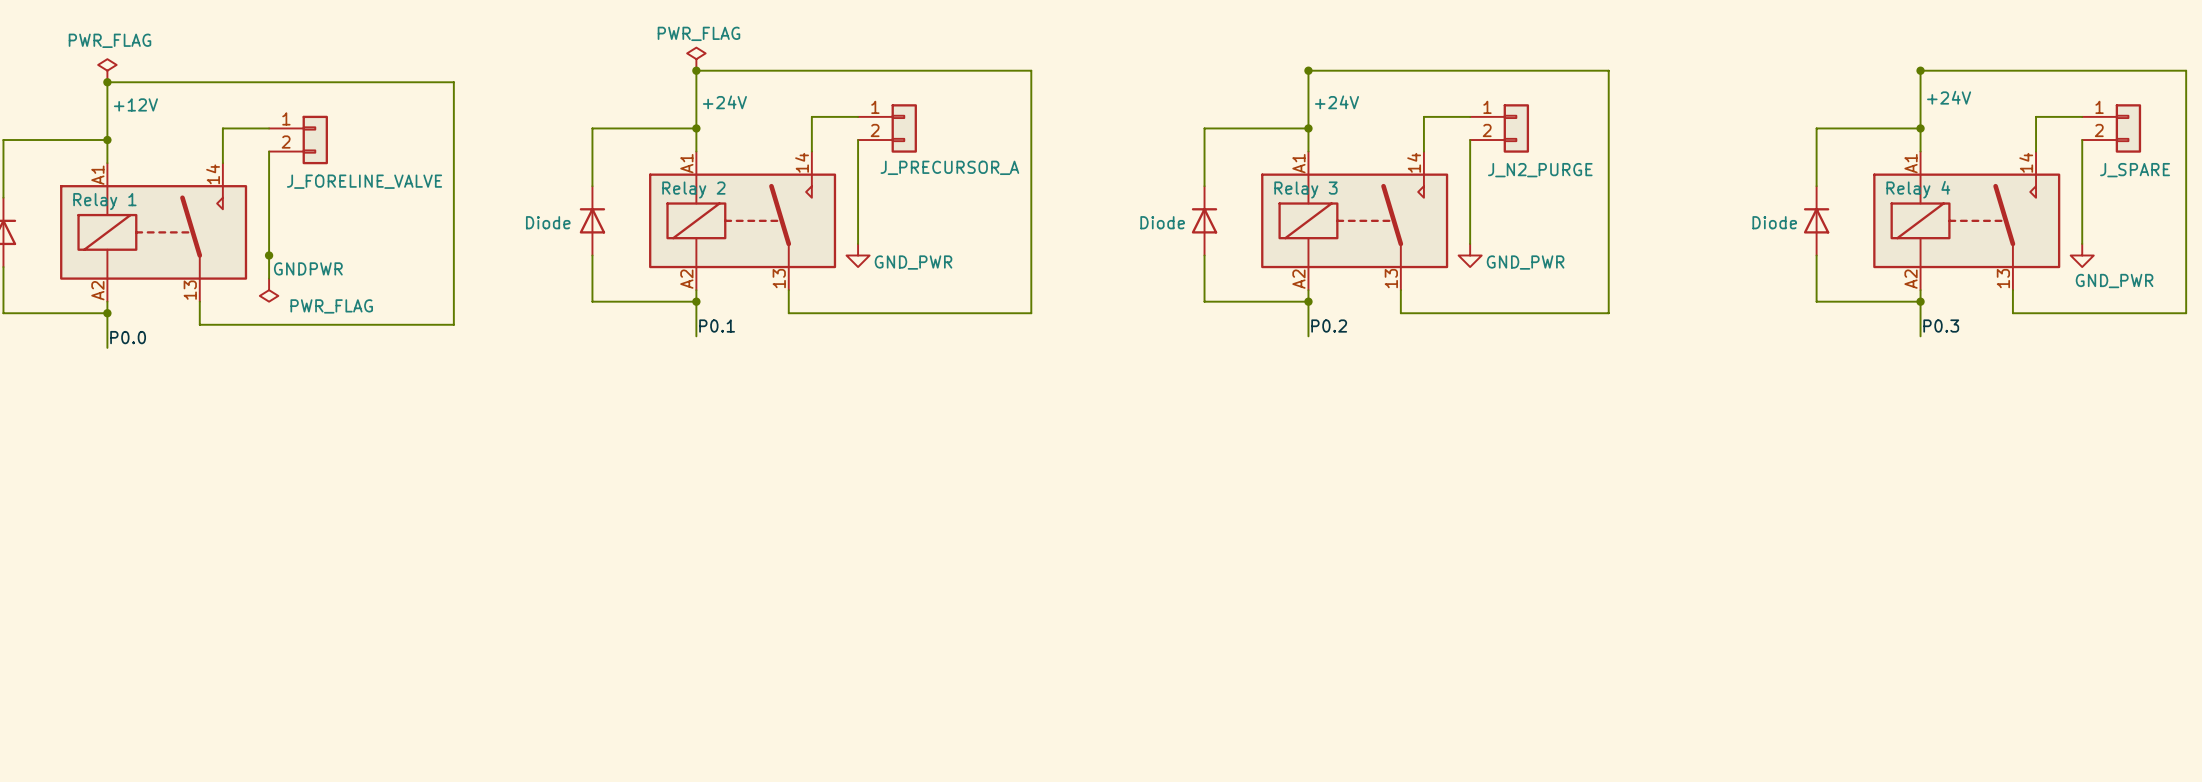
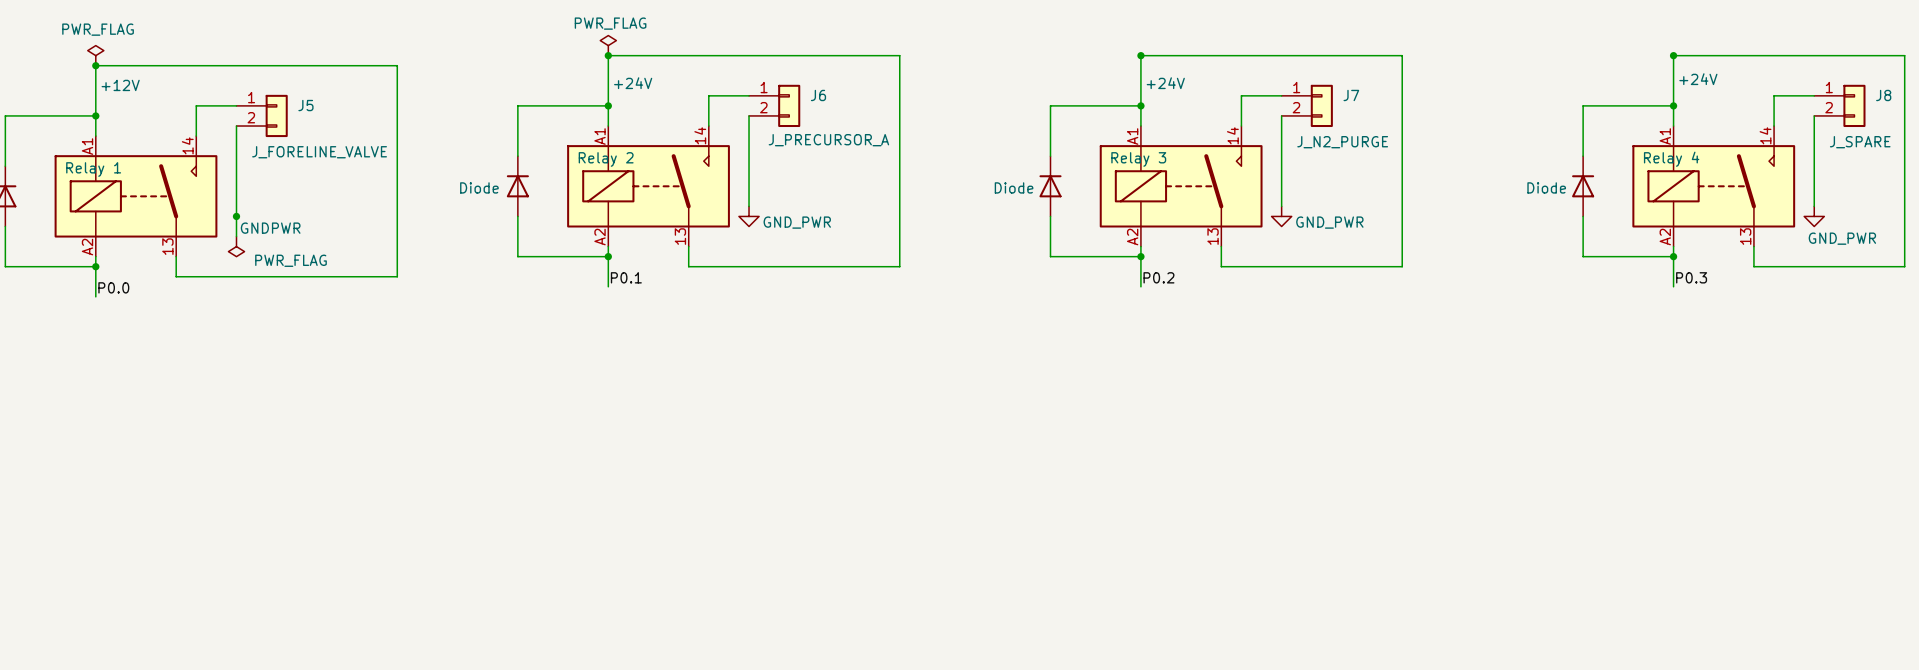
J6 name: none -> J6 (818, 95)
J7 name: none -> J7 (1351, 95)
J8 name: none -> J8 (1883, 95)
J5 name: none -> J5 (305, 105)

